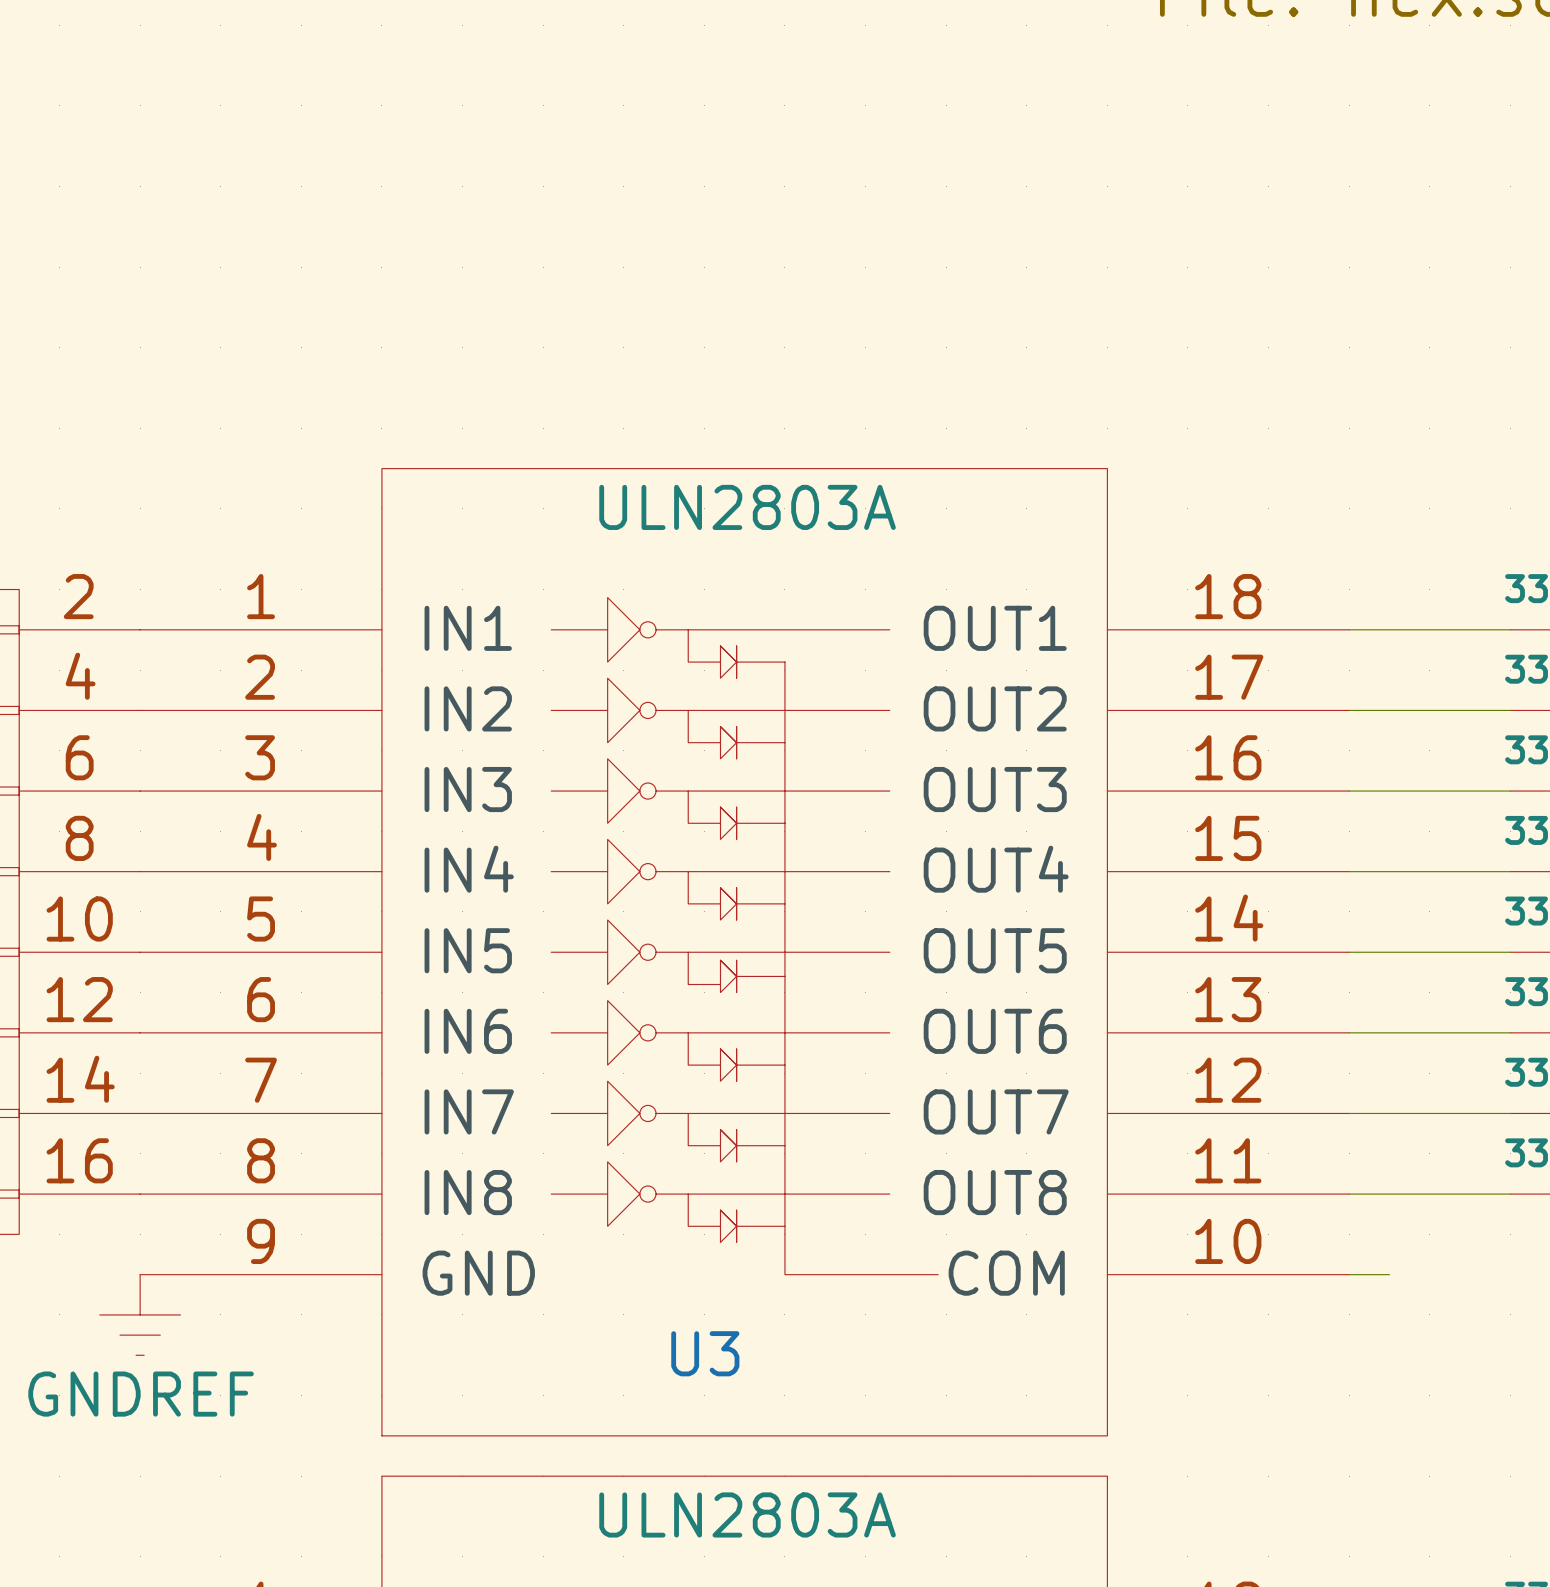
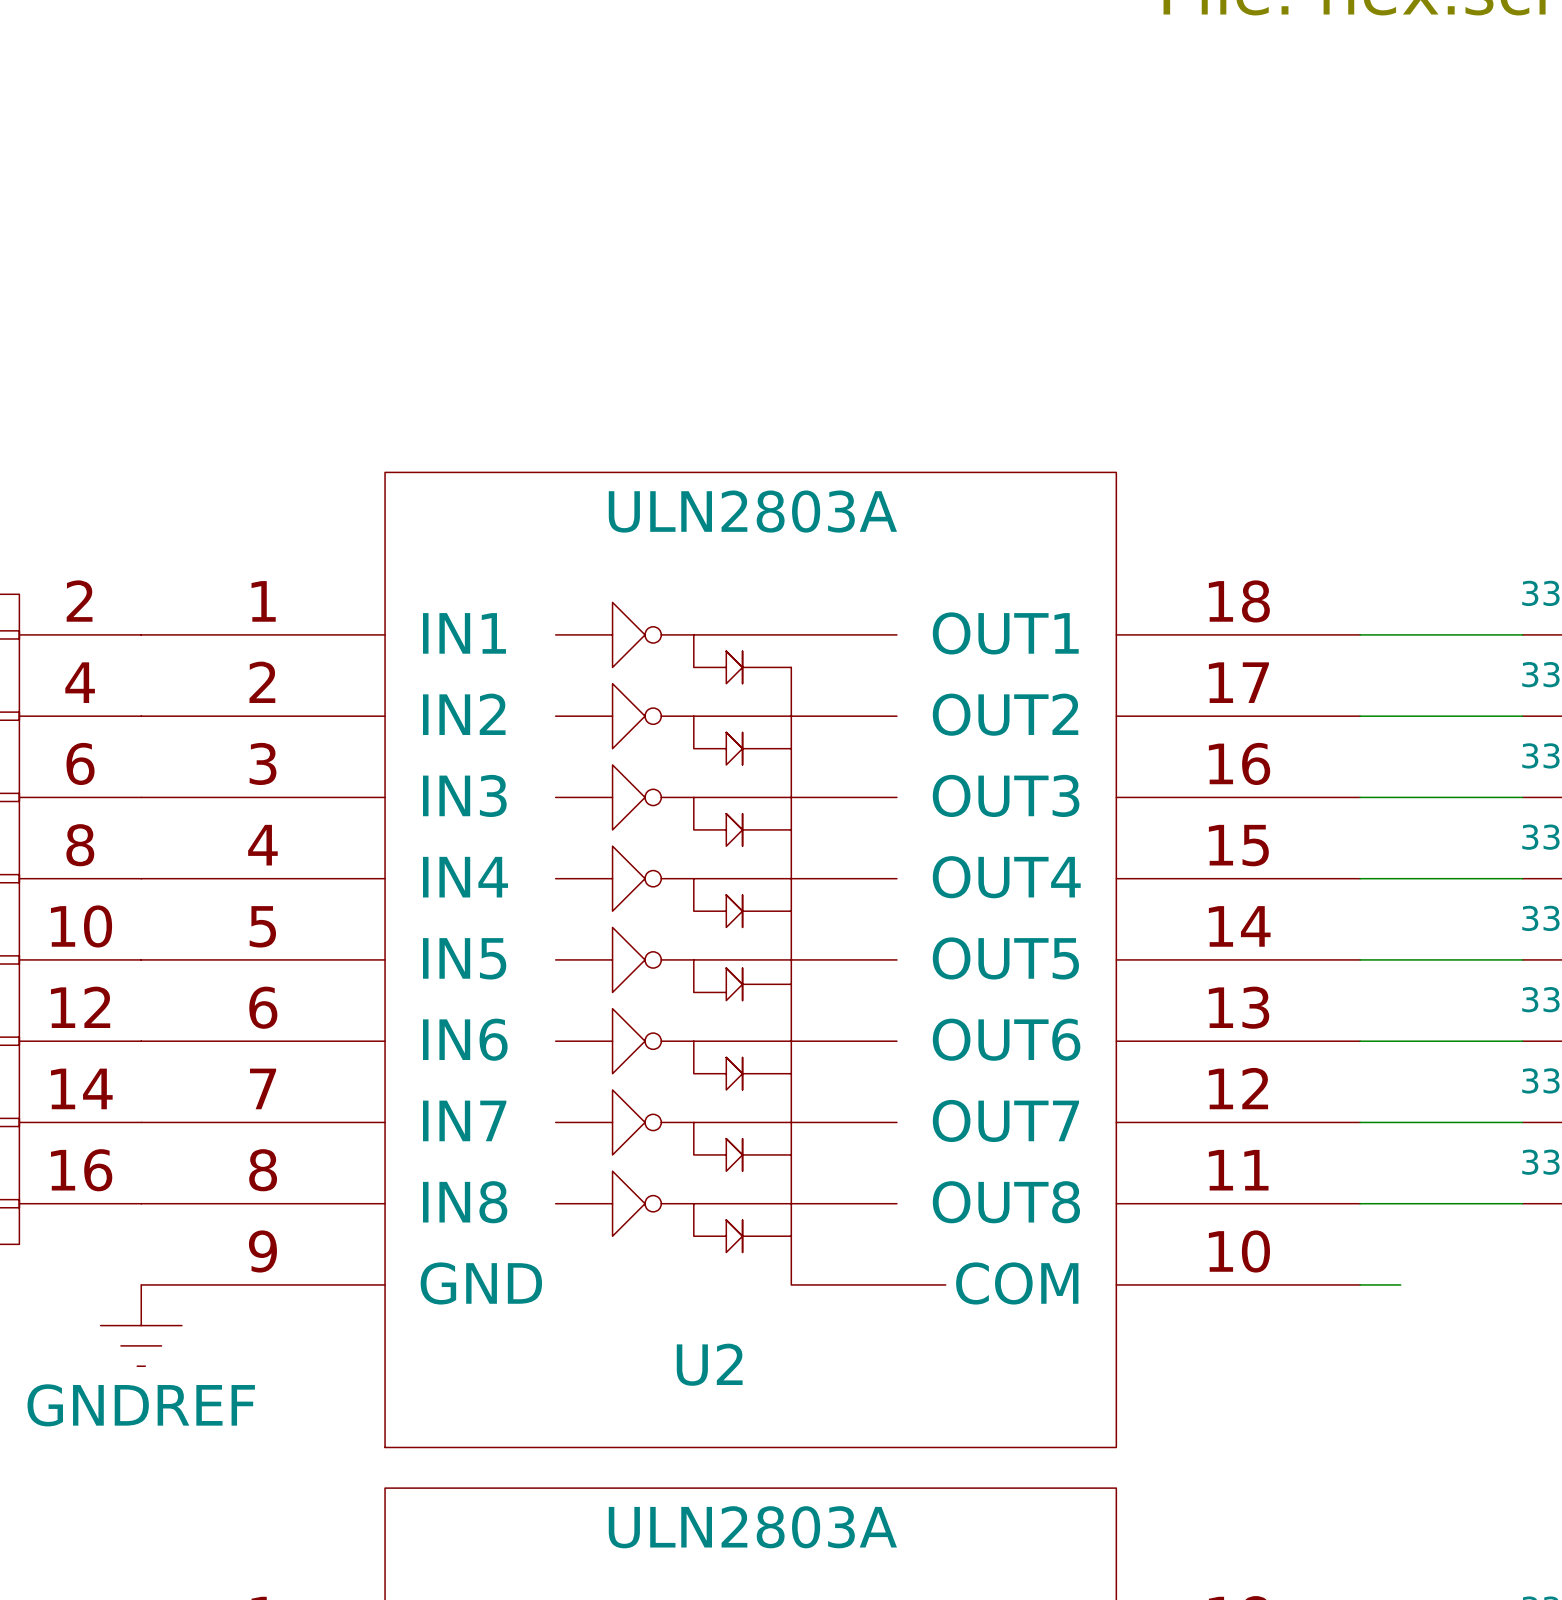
U3 name: U3 (705, 1353) -> U2 (709, 1364)

